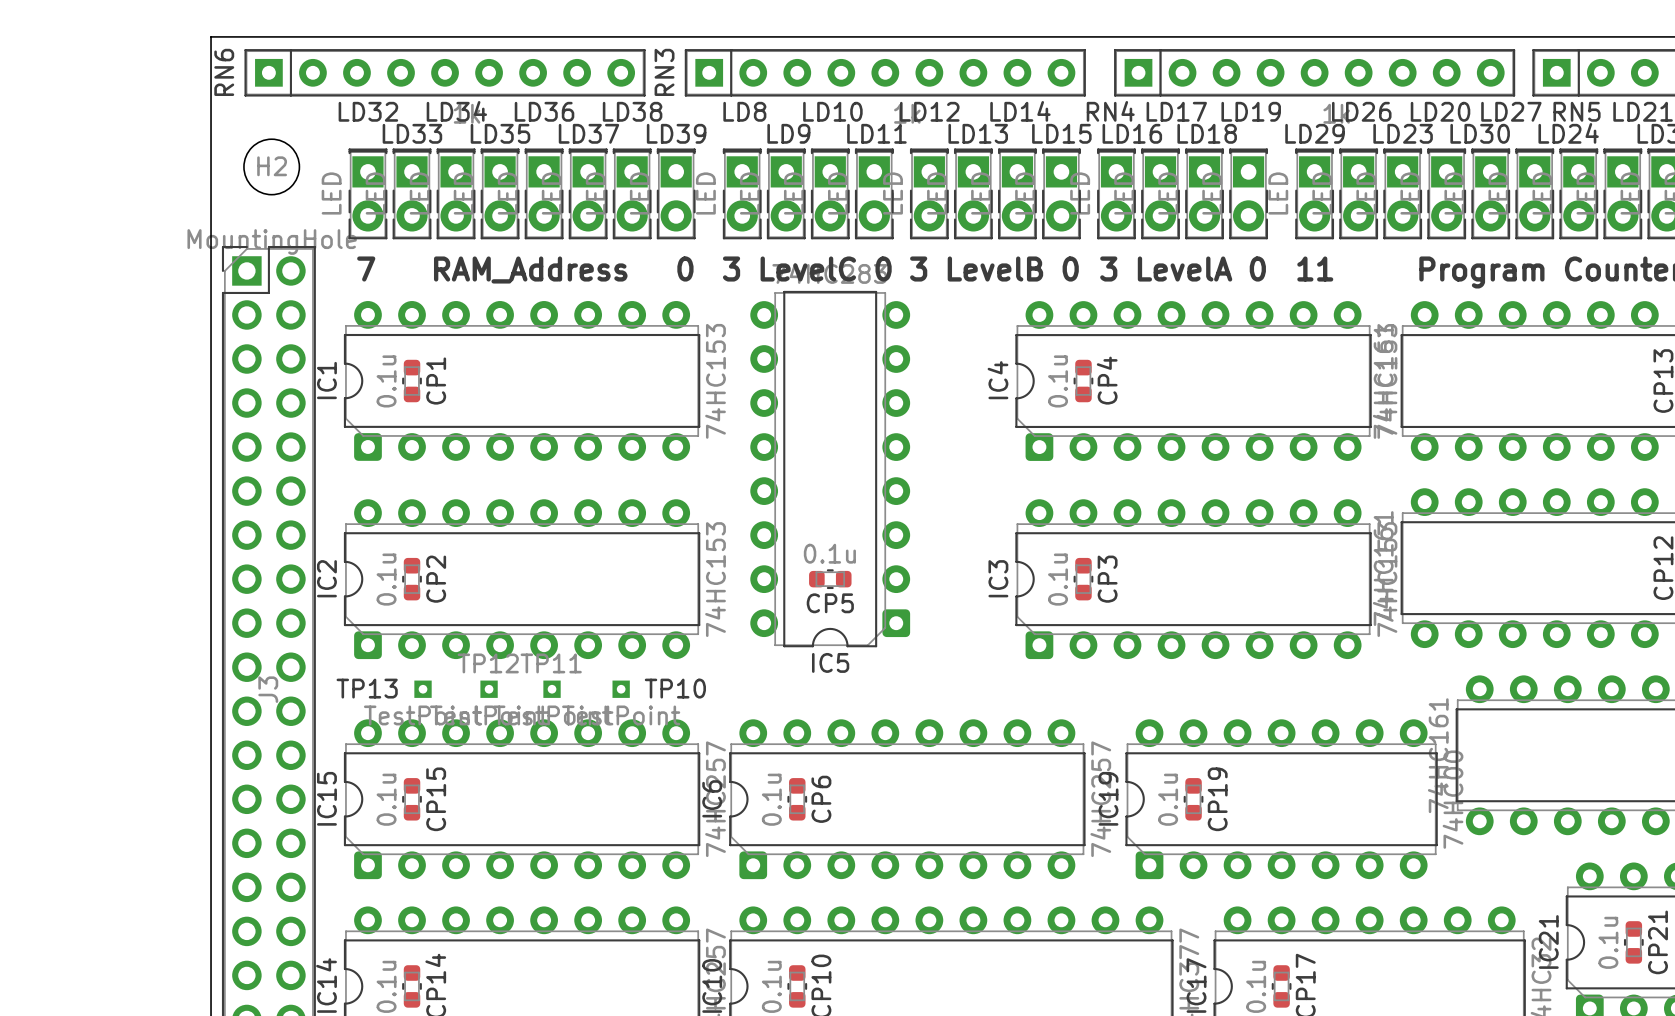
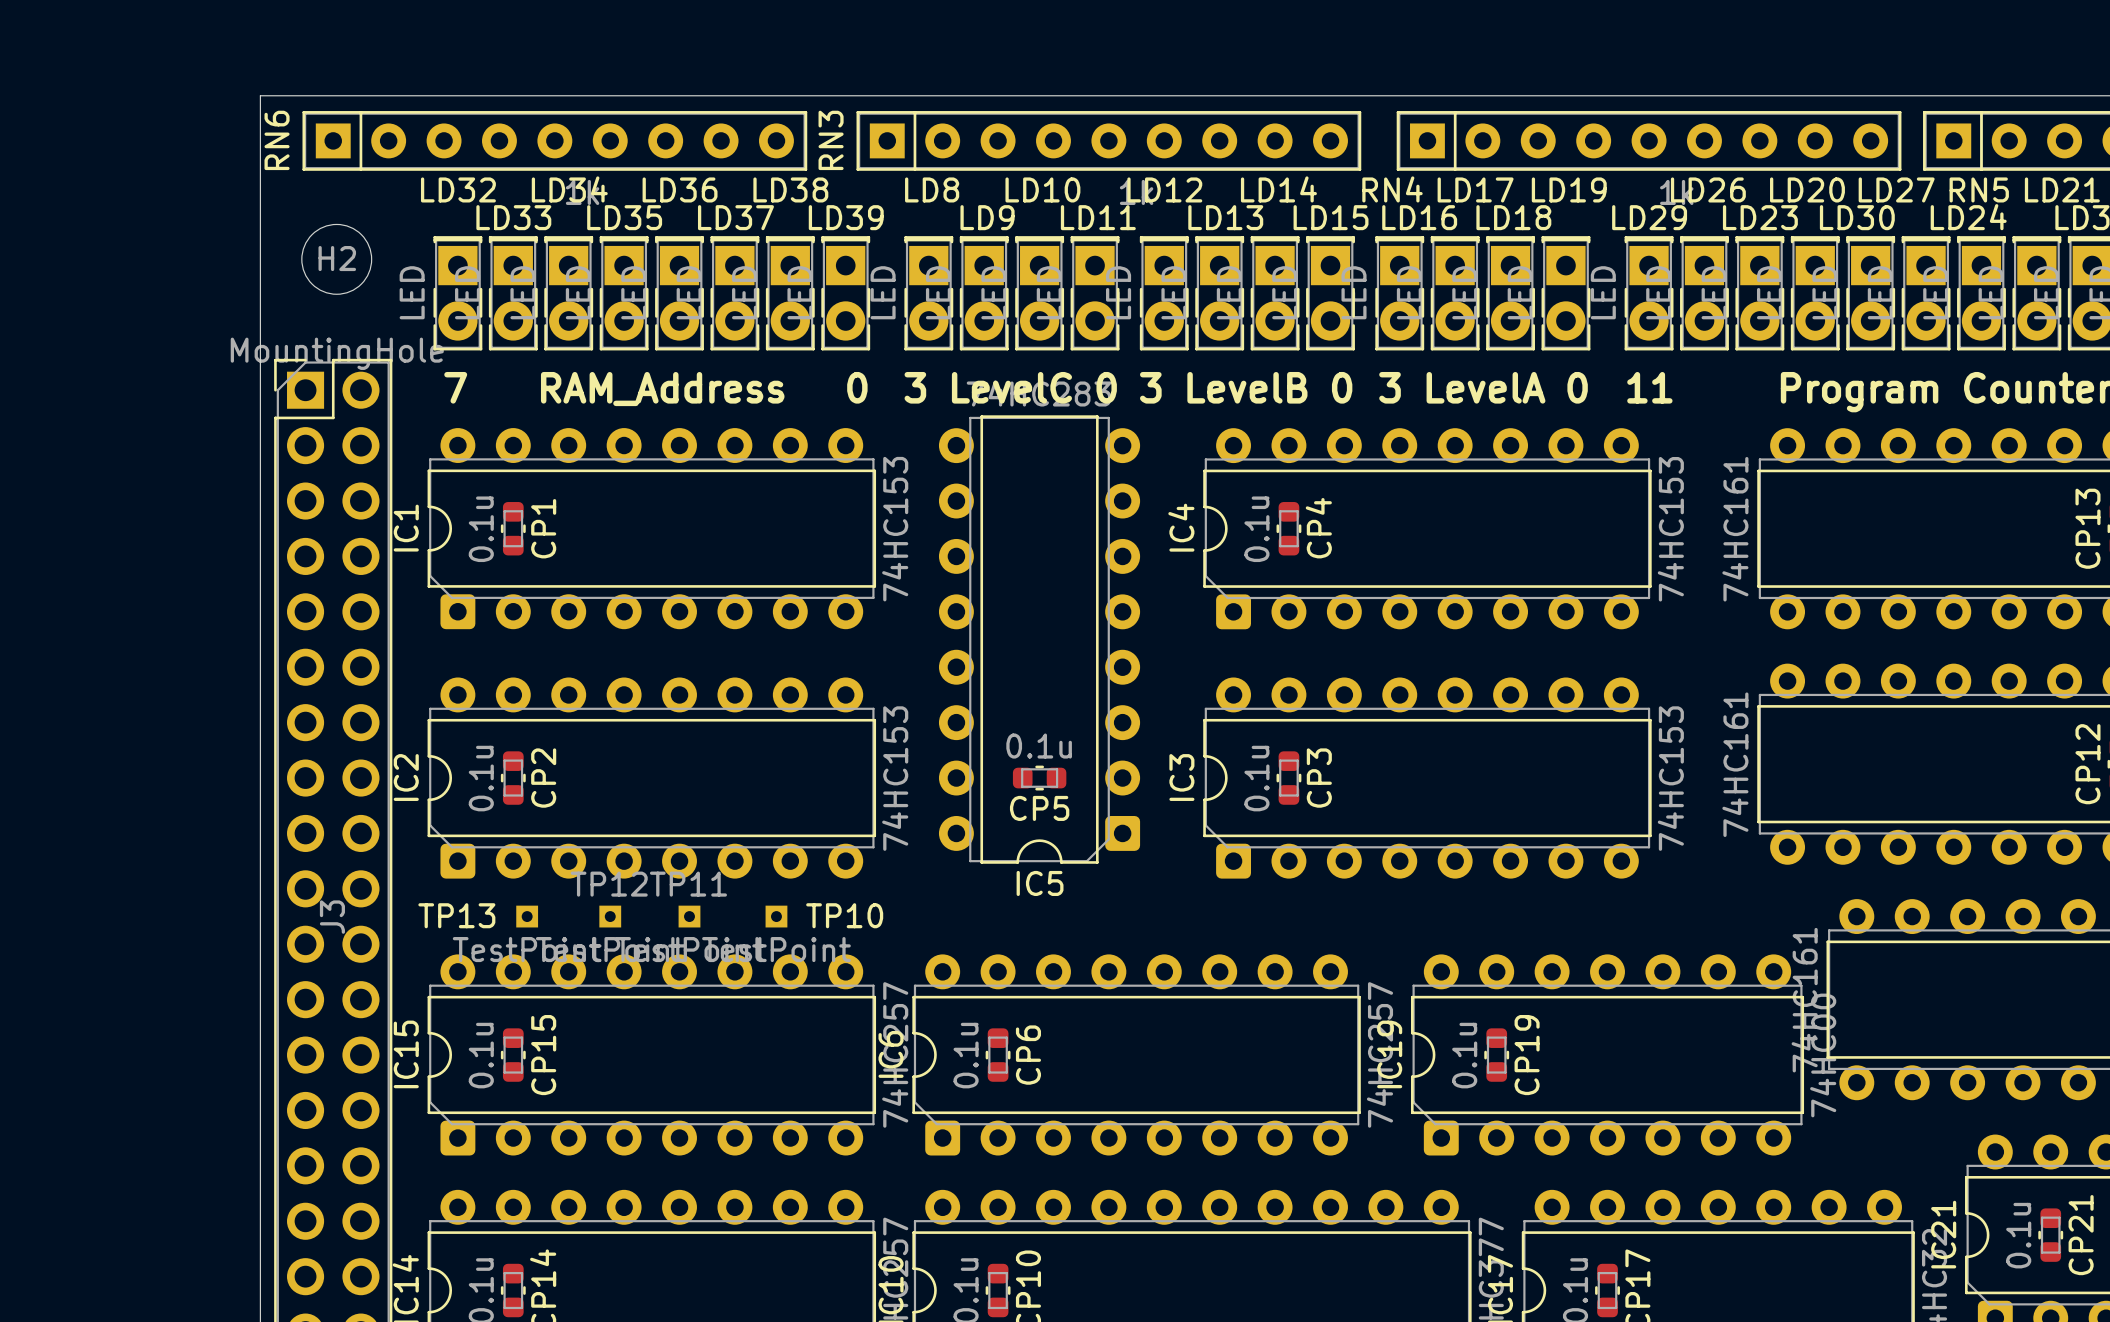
CP4 position: (1083, 381) -> (1288, 528)
IC4 position: (1193, 381) -> (1427, 528)
CP3 position: (1083, 579) -> (1288, 778)
IC3 position: (1193, 579) -> (1427, 778)

